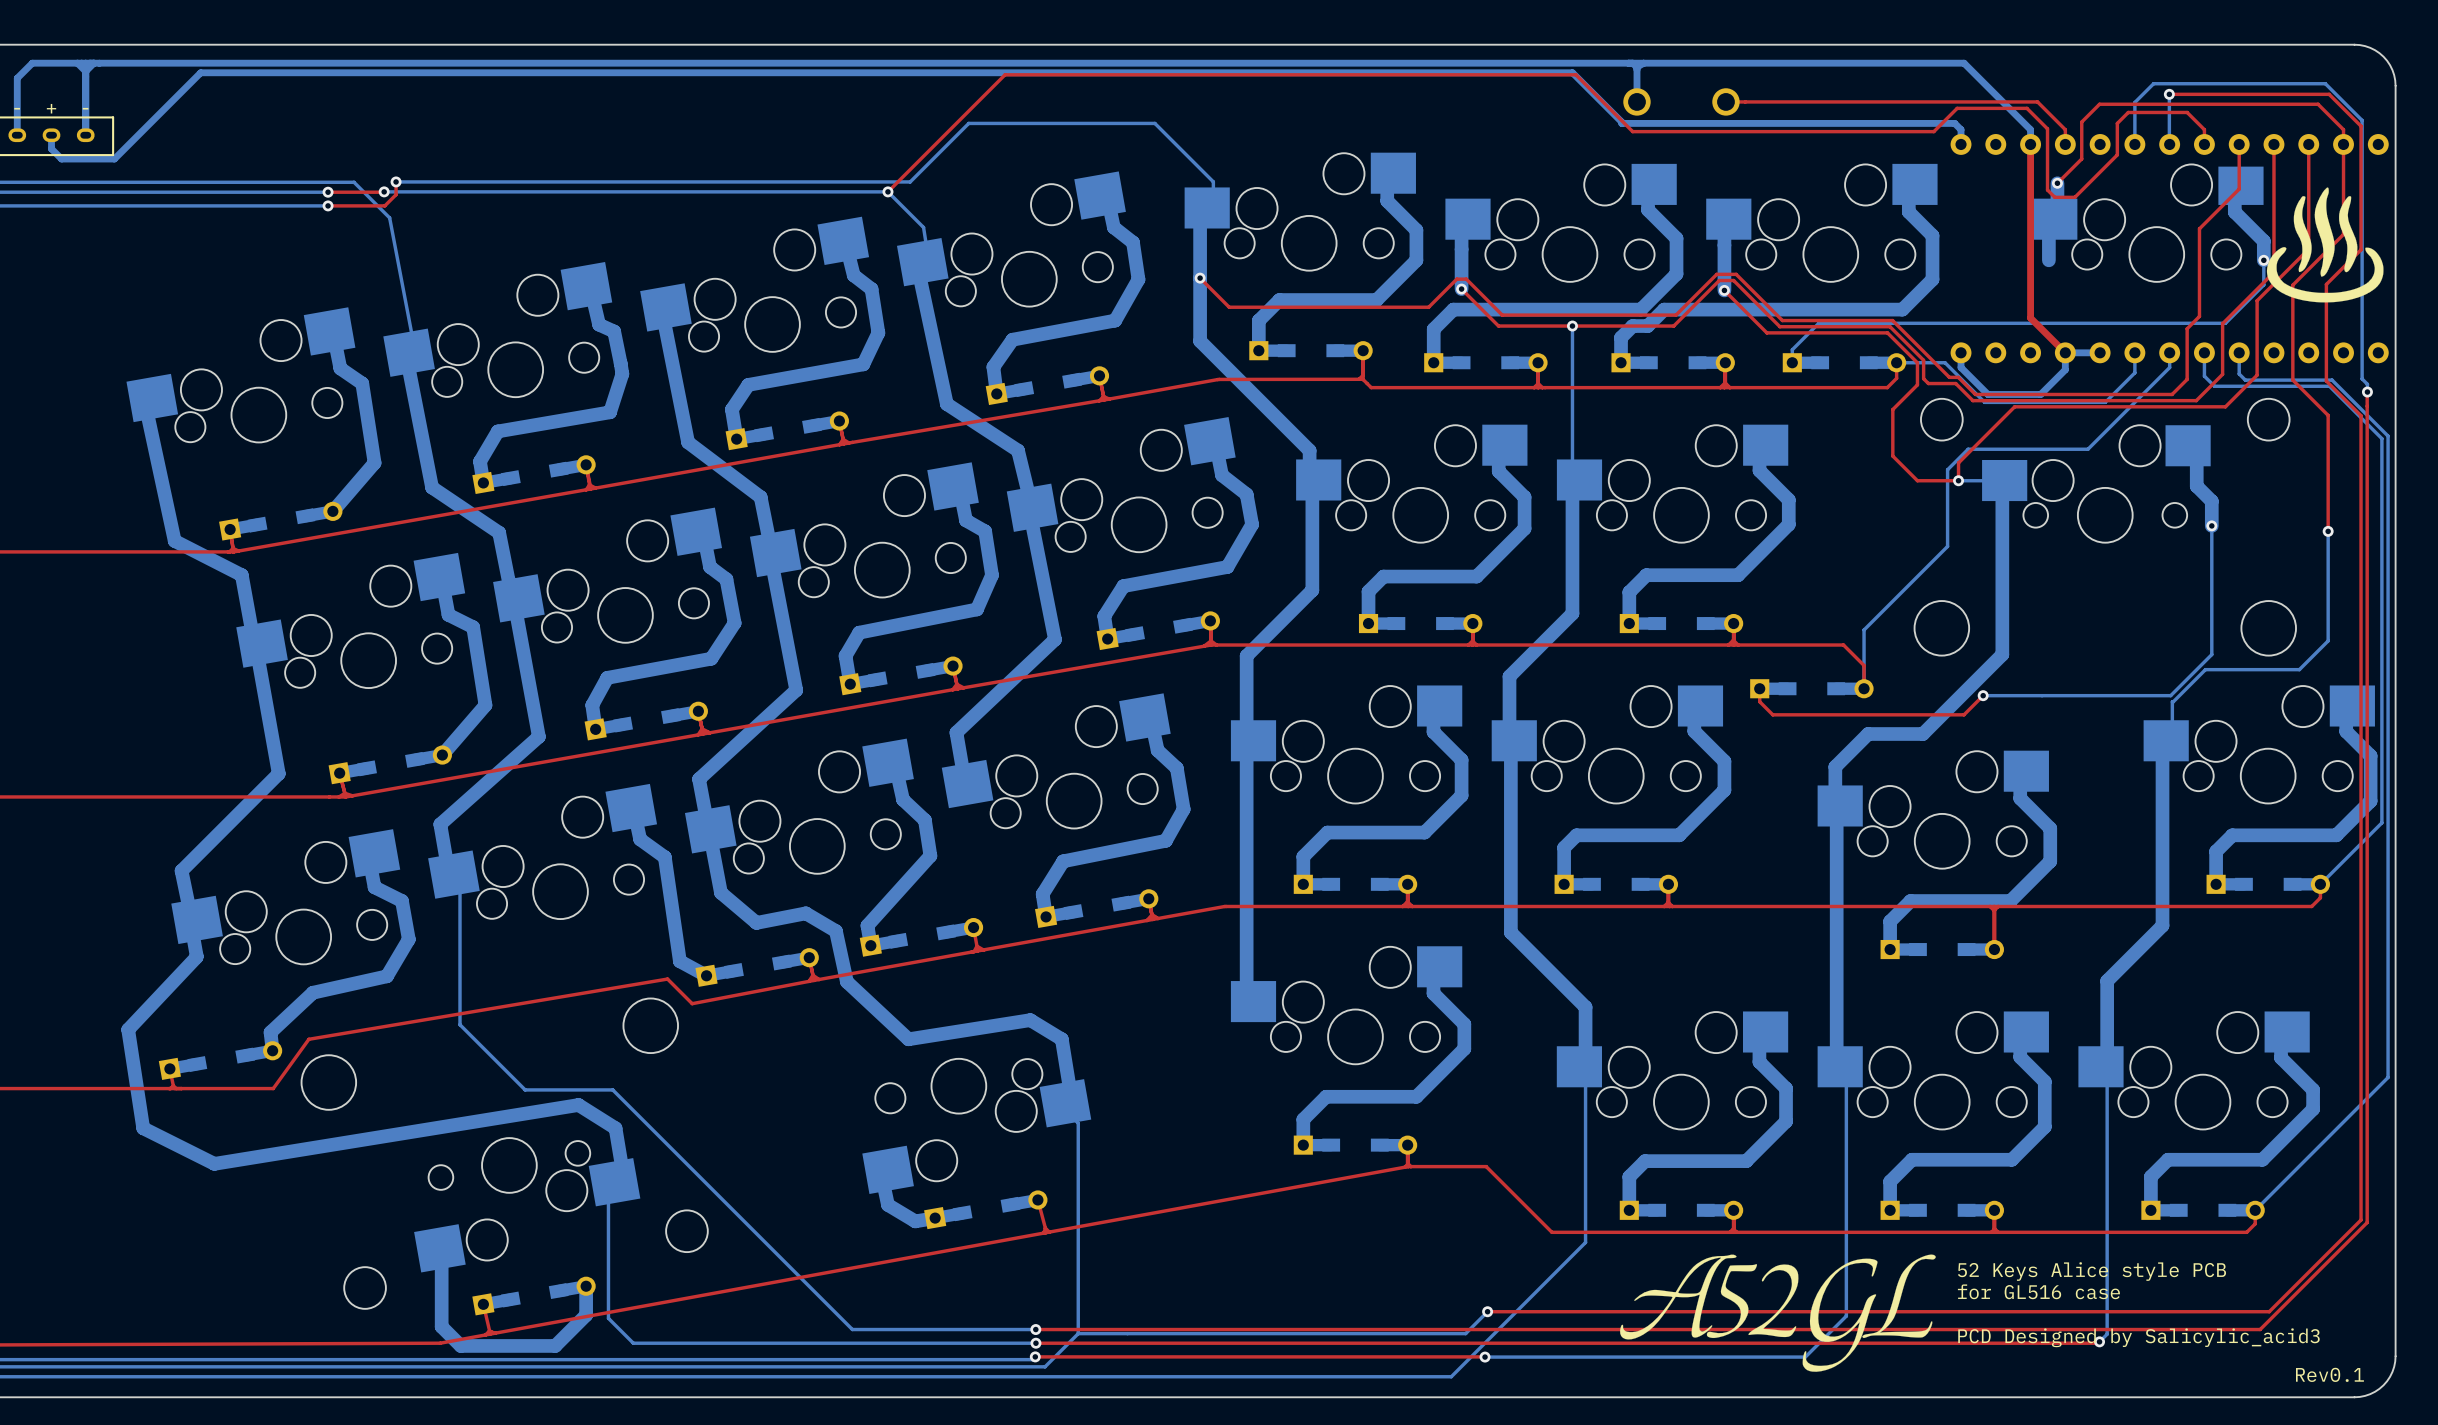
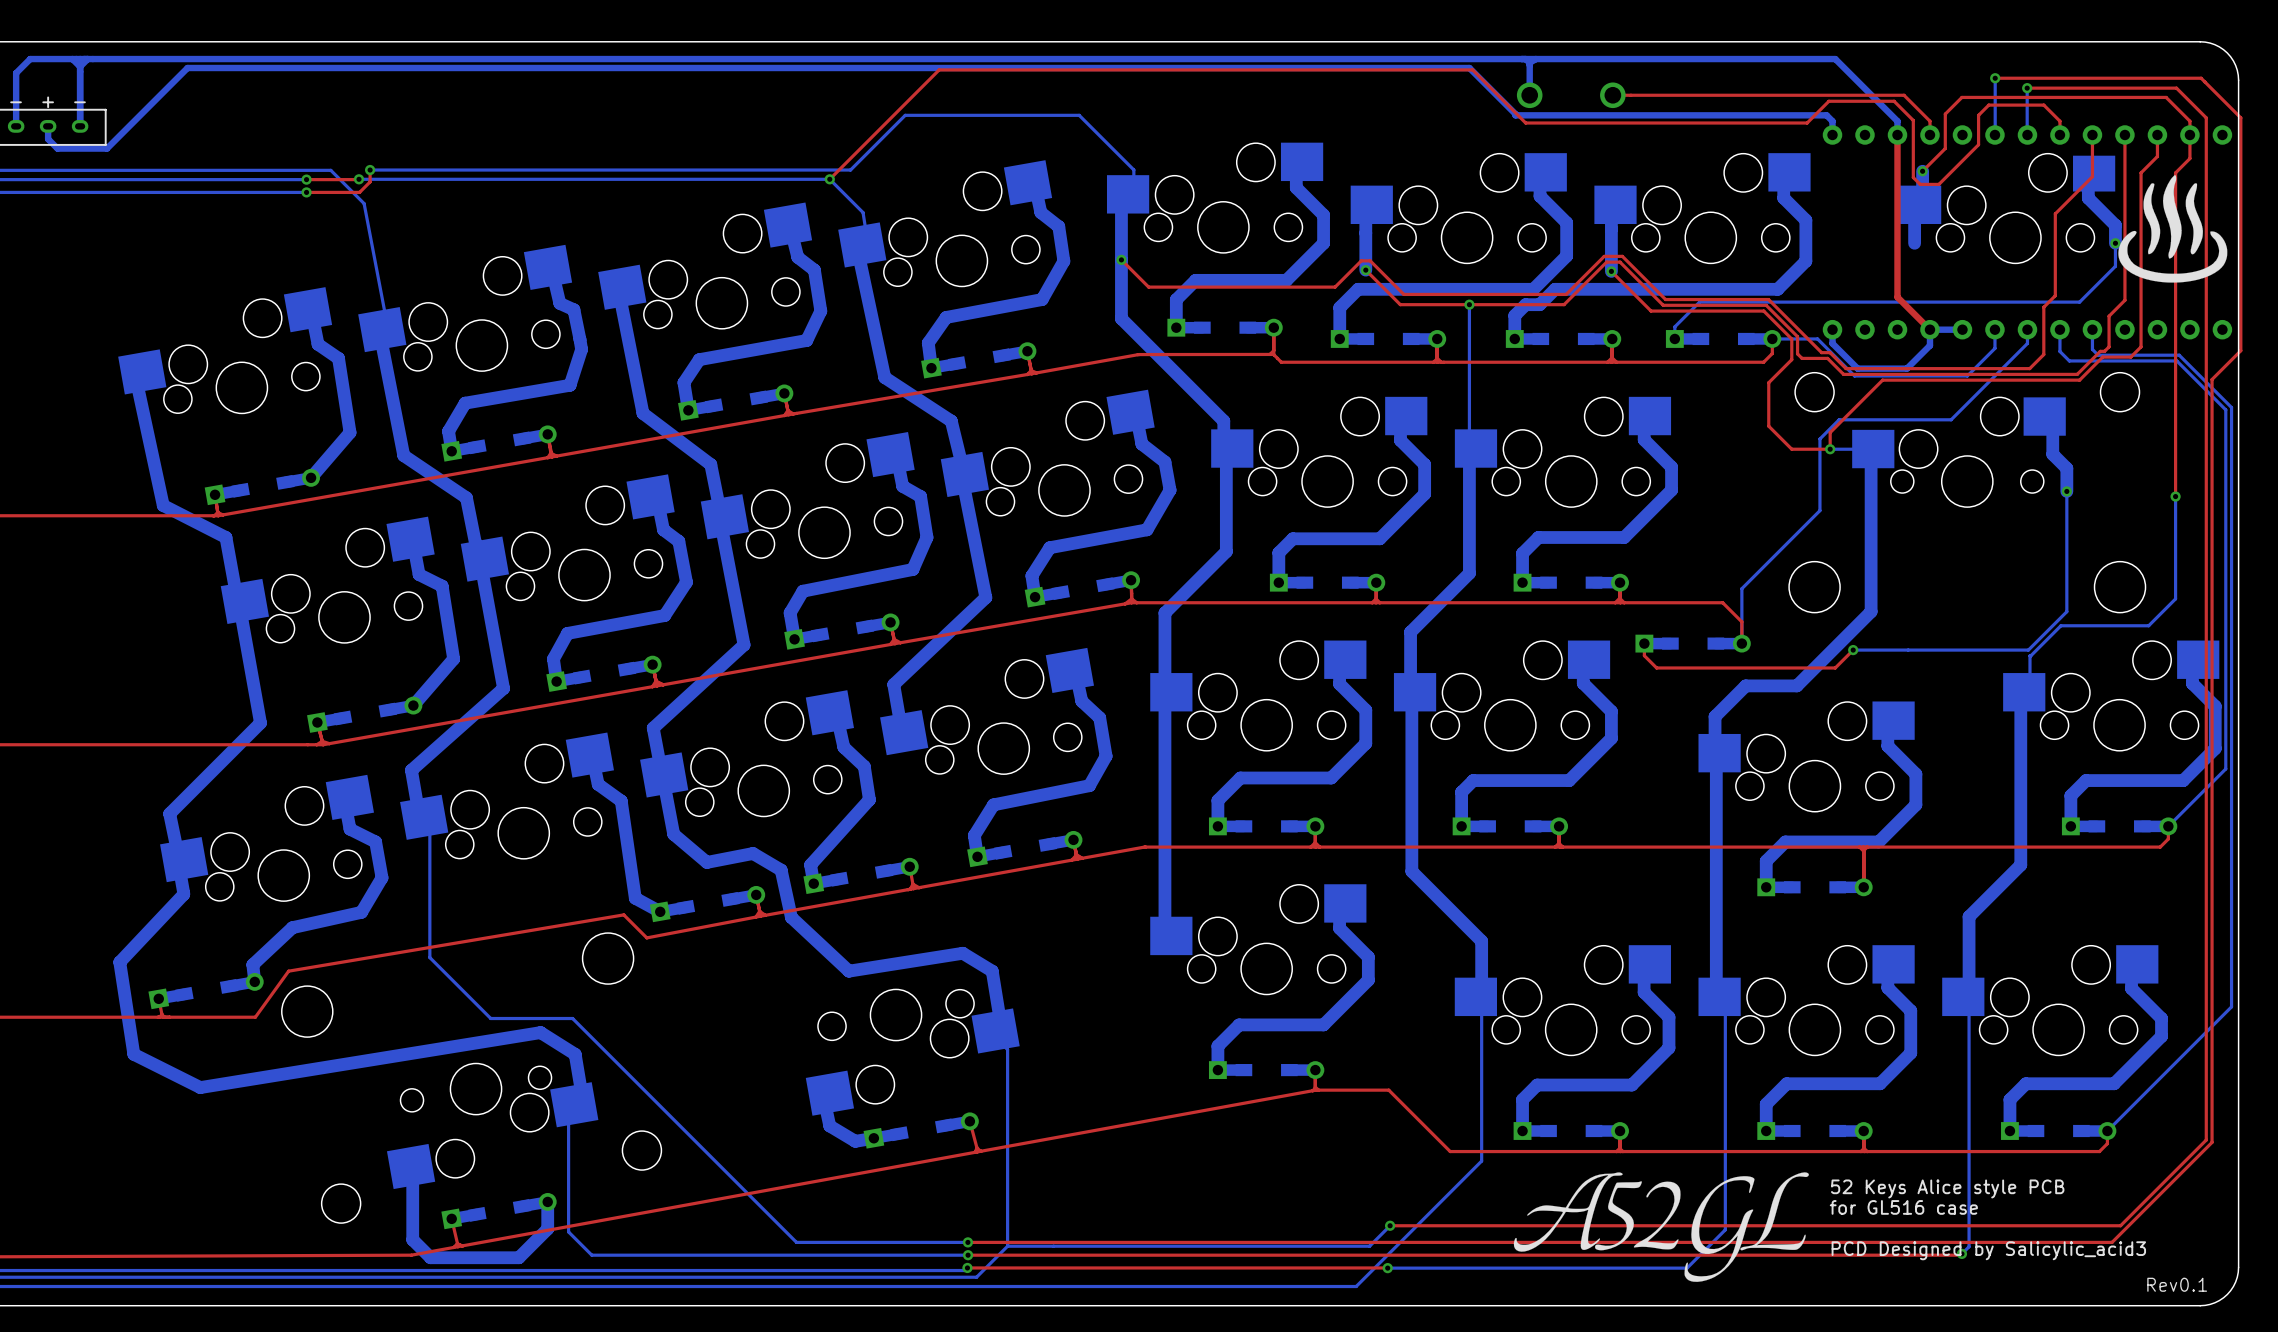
via: none -> (1995, 78)
bottom track: (2134, 144) (2134, 102) (2153, 83) (2325, 83) (2362, 120) (2362, 378) (2367, 384) (2367, 392) -> (1994, 134) (1995, 78)
top track: (2308, 167) (2308, 249) (2257, 300) (2257, 375) (2250, 382) -> (2157, 156) (2141, 172) (2141, 346) (2130, 357) (2102, 357)
top track: (2343, 169) (2343, 234) (2292, 285) (2292, 380) (2328, 415) -> (2189, 158) (2175, 172) (2175, 388)
top track: (2361, 249) (2326, 284) (2326, 381) (2361, 415) -> (2206, 233) (2206, 388)
top track: (2273, 272) (2222, 323) (2222, 374) (2196, 400) -> (2124, 254) (2124, 300) (2109, 316) (2109, 346) (2104, 351) (2100, 351) (2077, 374) (2052, 374)
top track: (2367, 392) (2367, 406) -> (1995, 78) (2201, 78) (2240, 117) (2240, 350) (2212, 379)
via: (2367, 392) -> none

